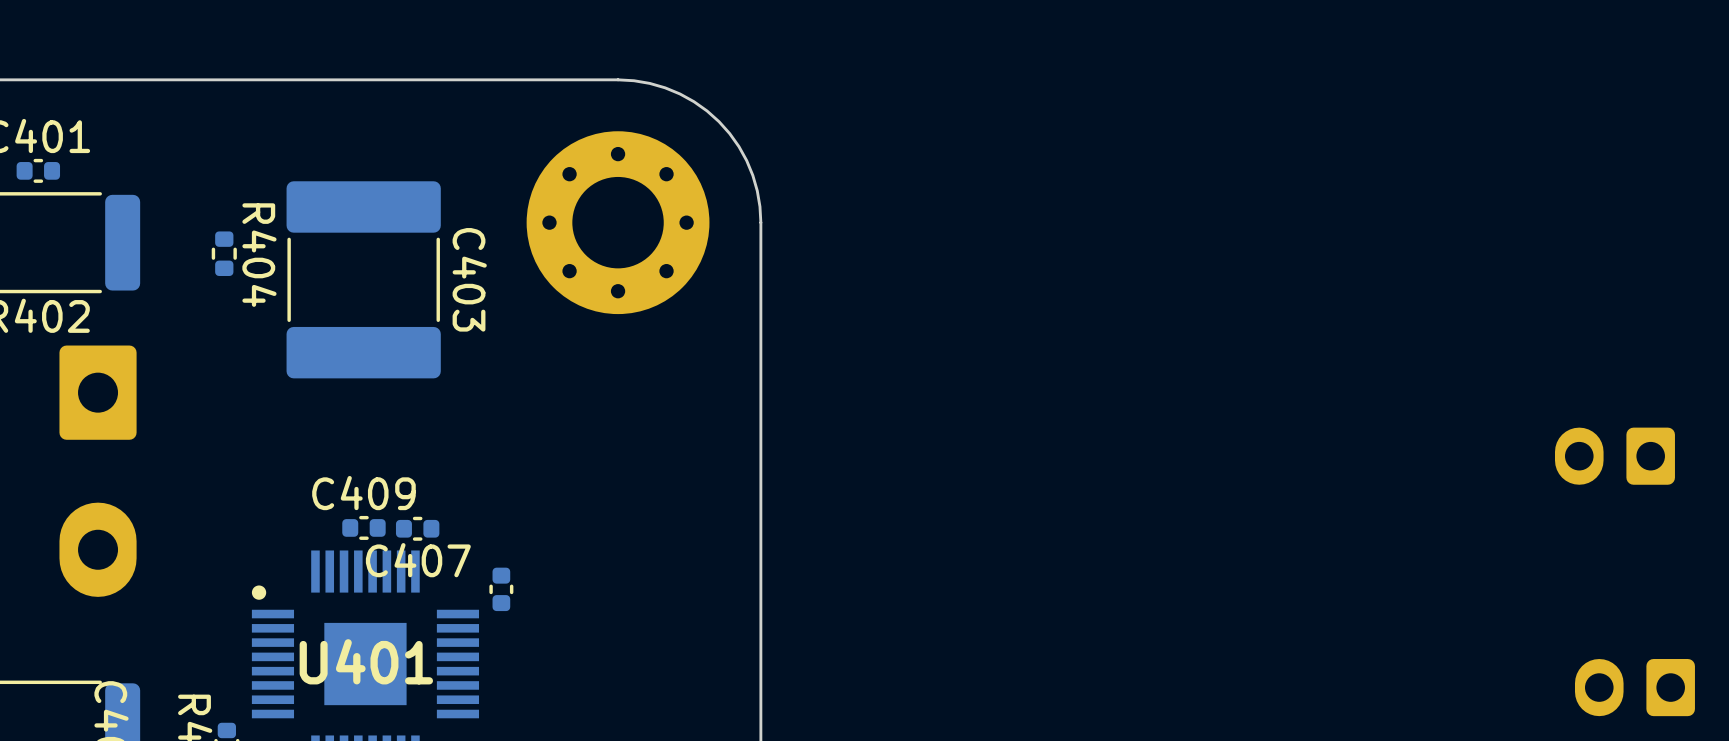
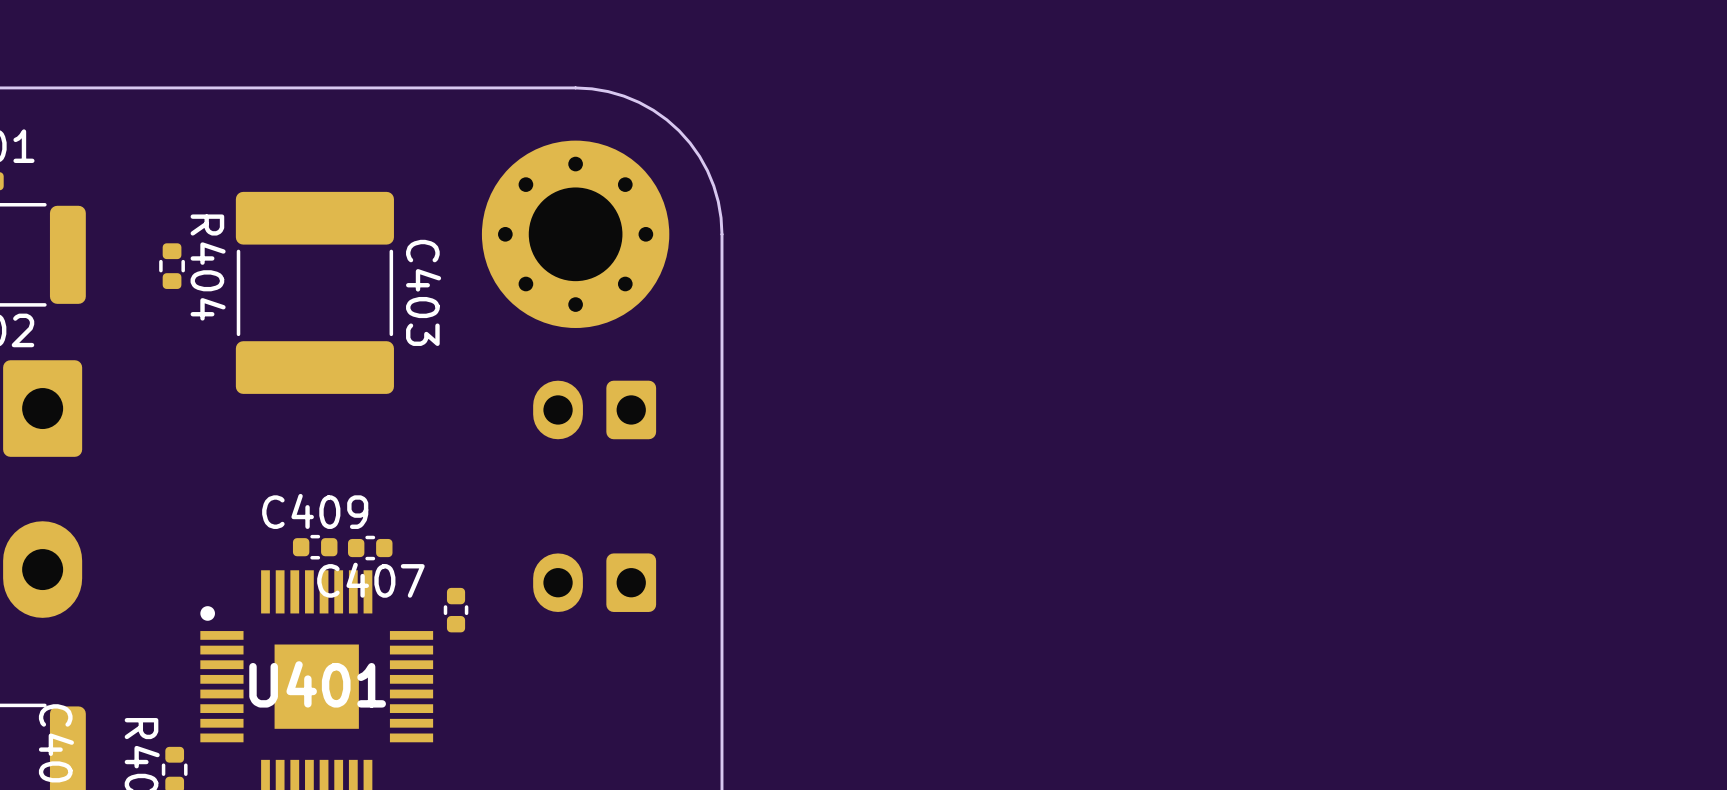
part: none -> (594, 409)
part: (1614, 456) -> none
part: none -> (594, 582)
part: (1634, 687) -> none

